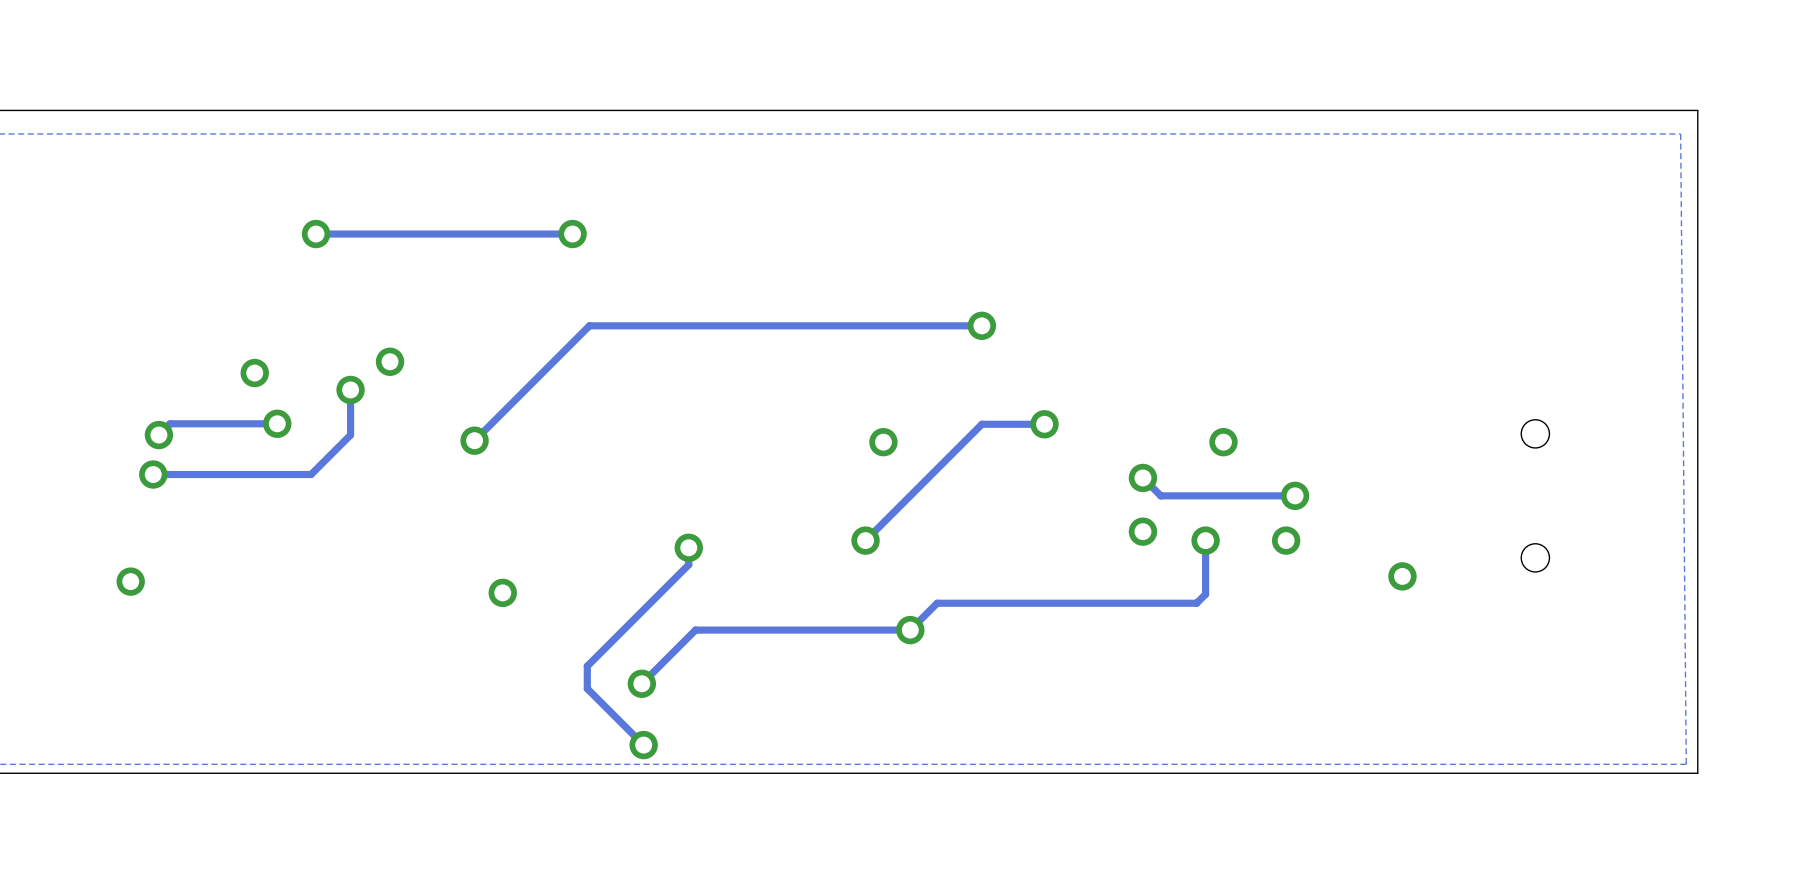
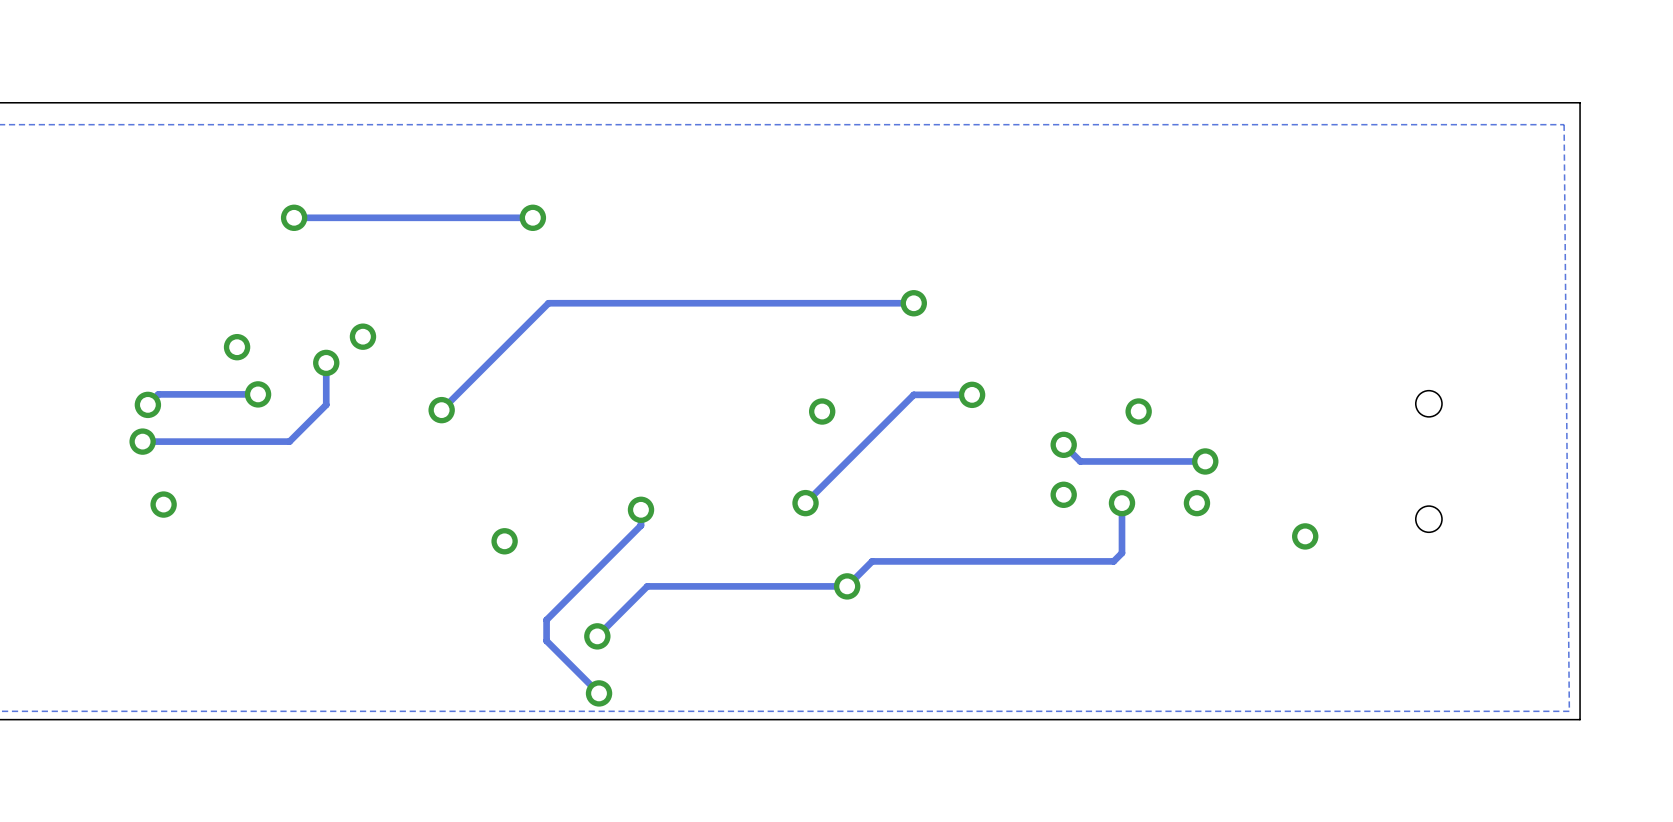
via position: (130, 581) -> (163, 504)
via position: (502, 592) -> (504, 541)

